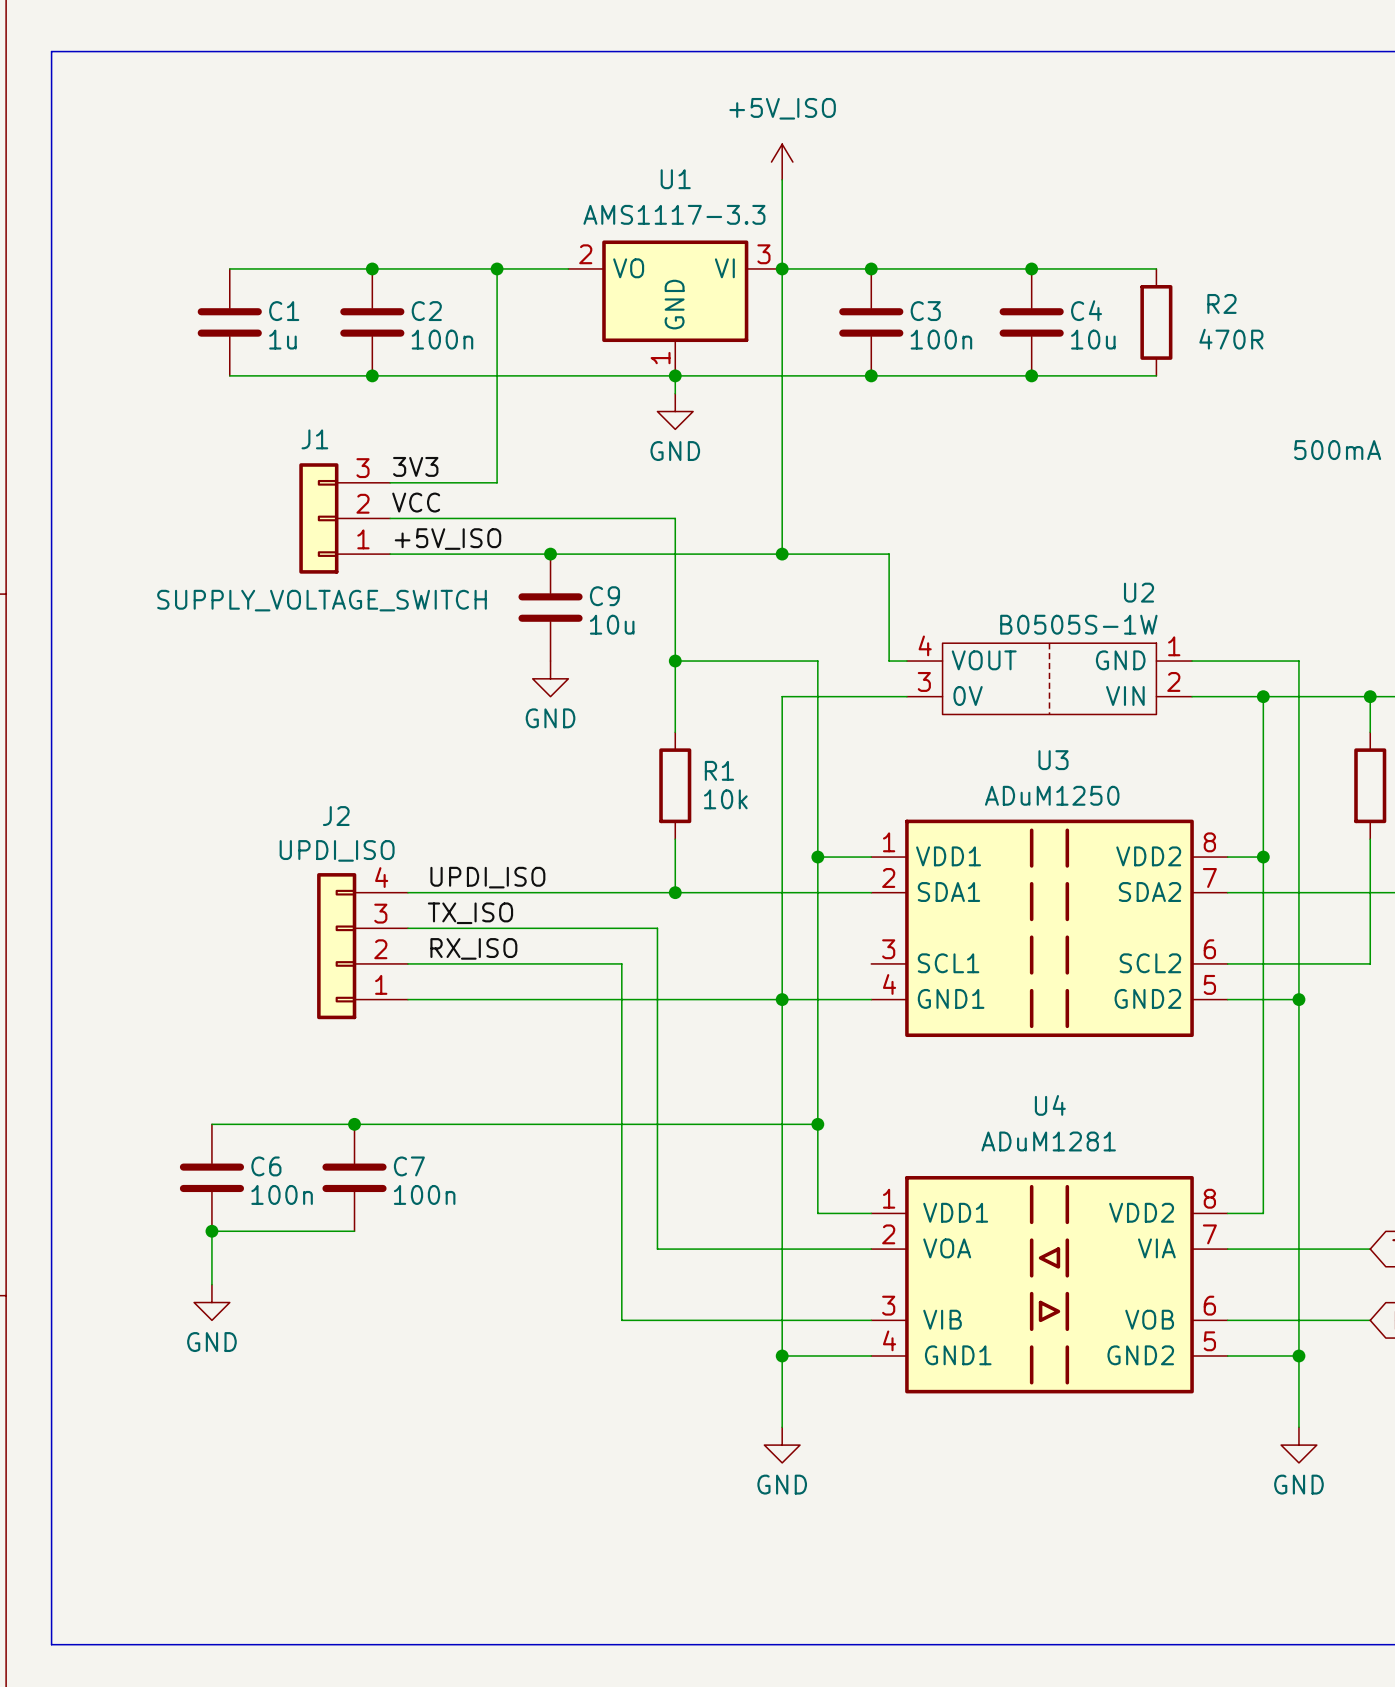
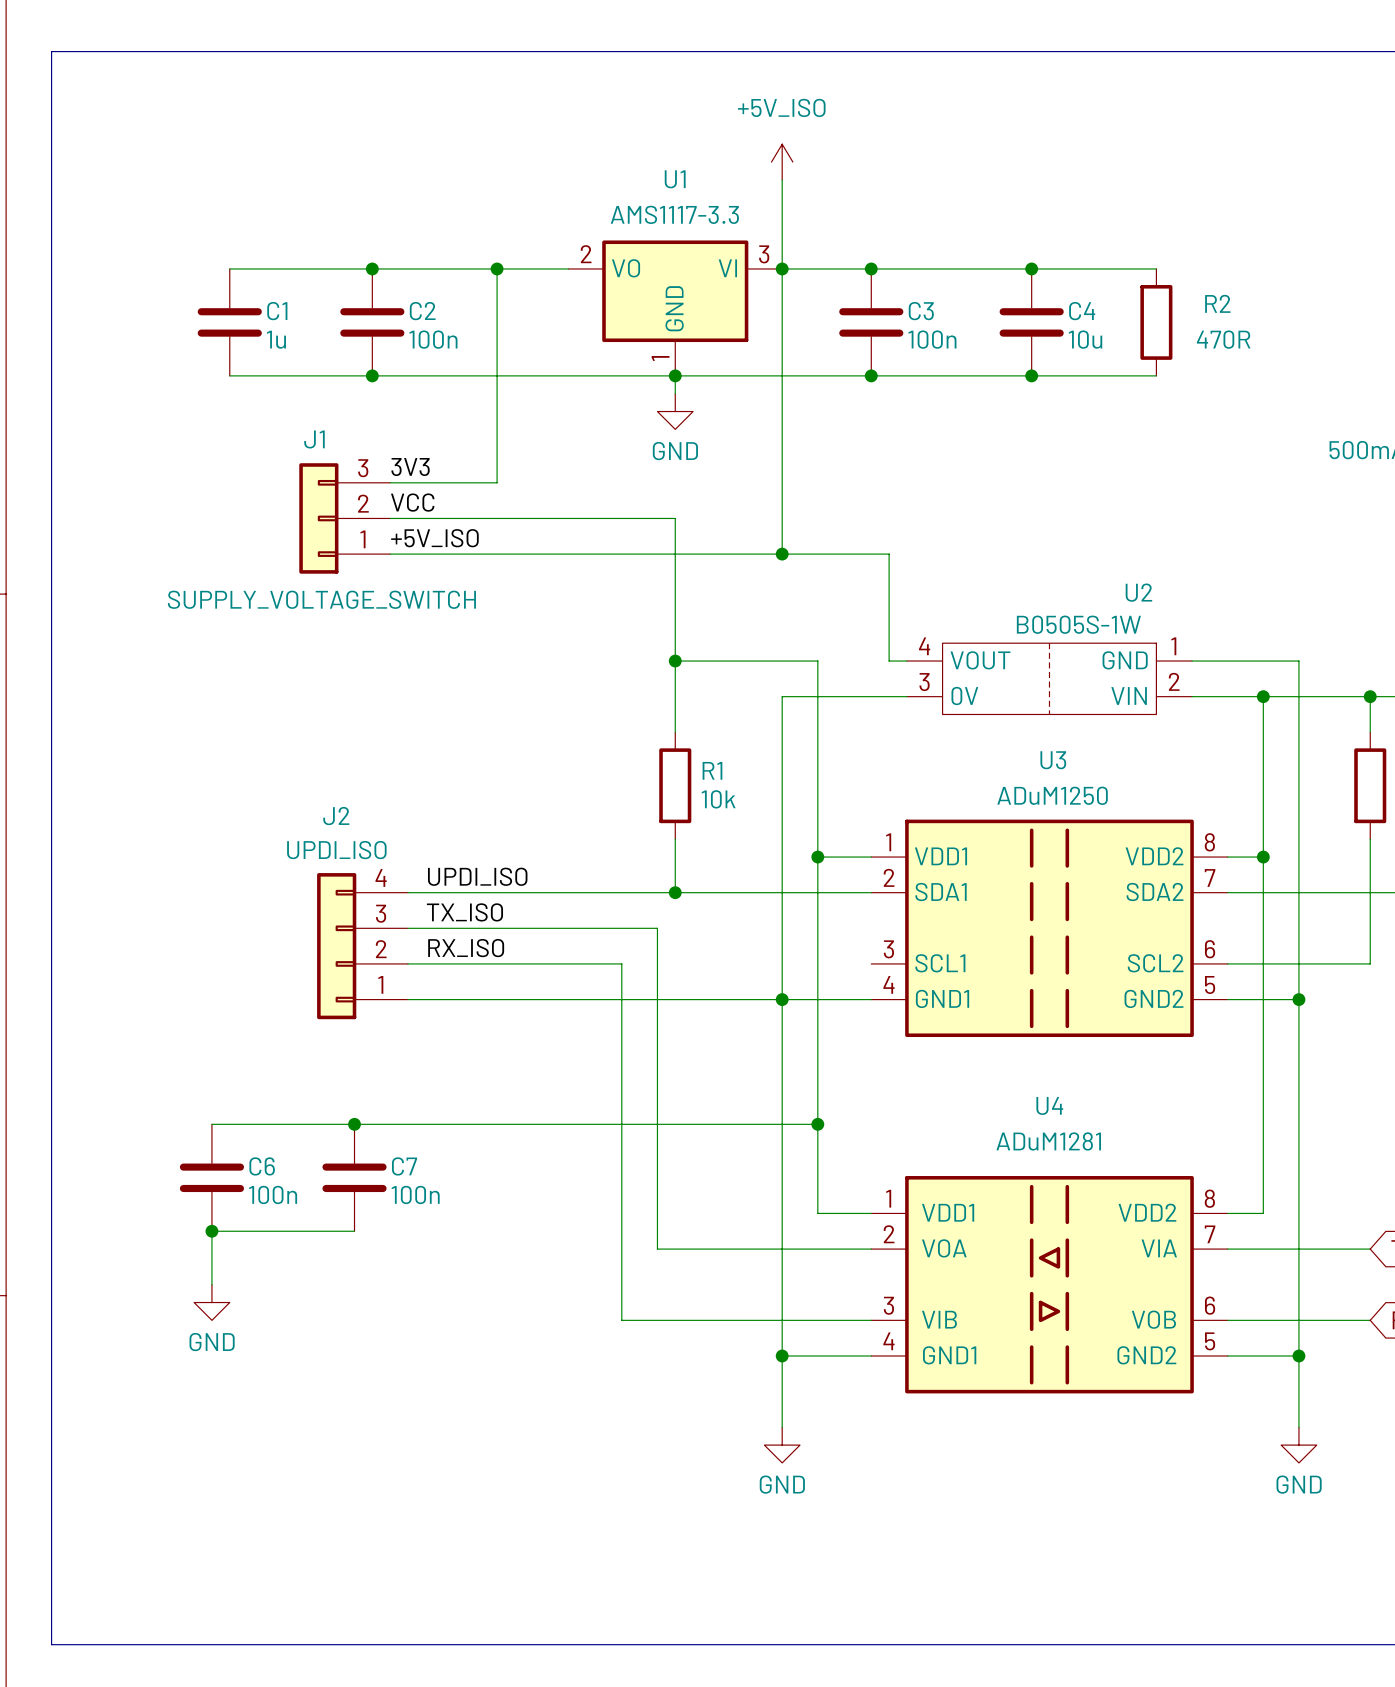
junction: (550, 554) -> none
C9: 10u (550, 607) -> none
power symbol: GND (550, 678) -> none

